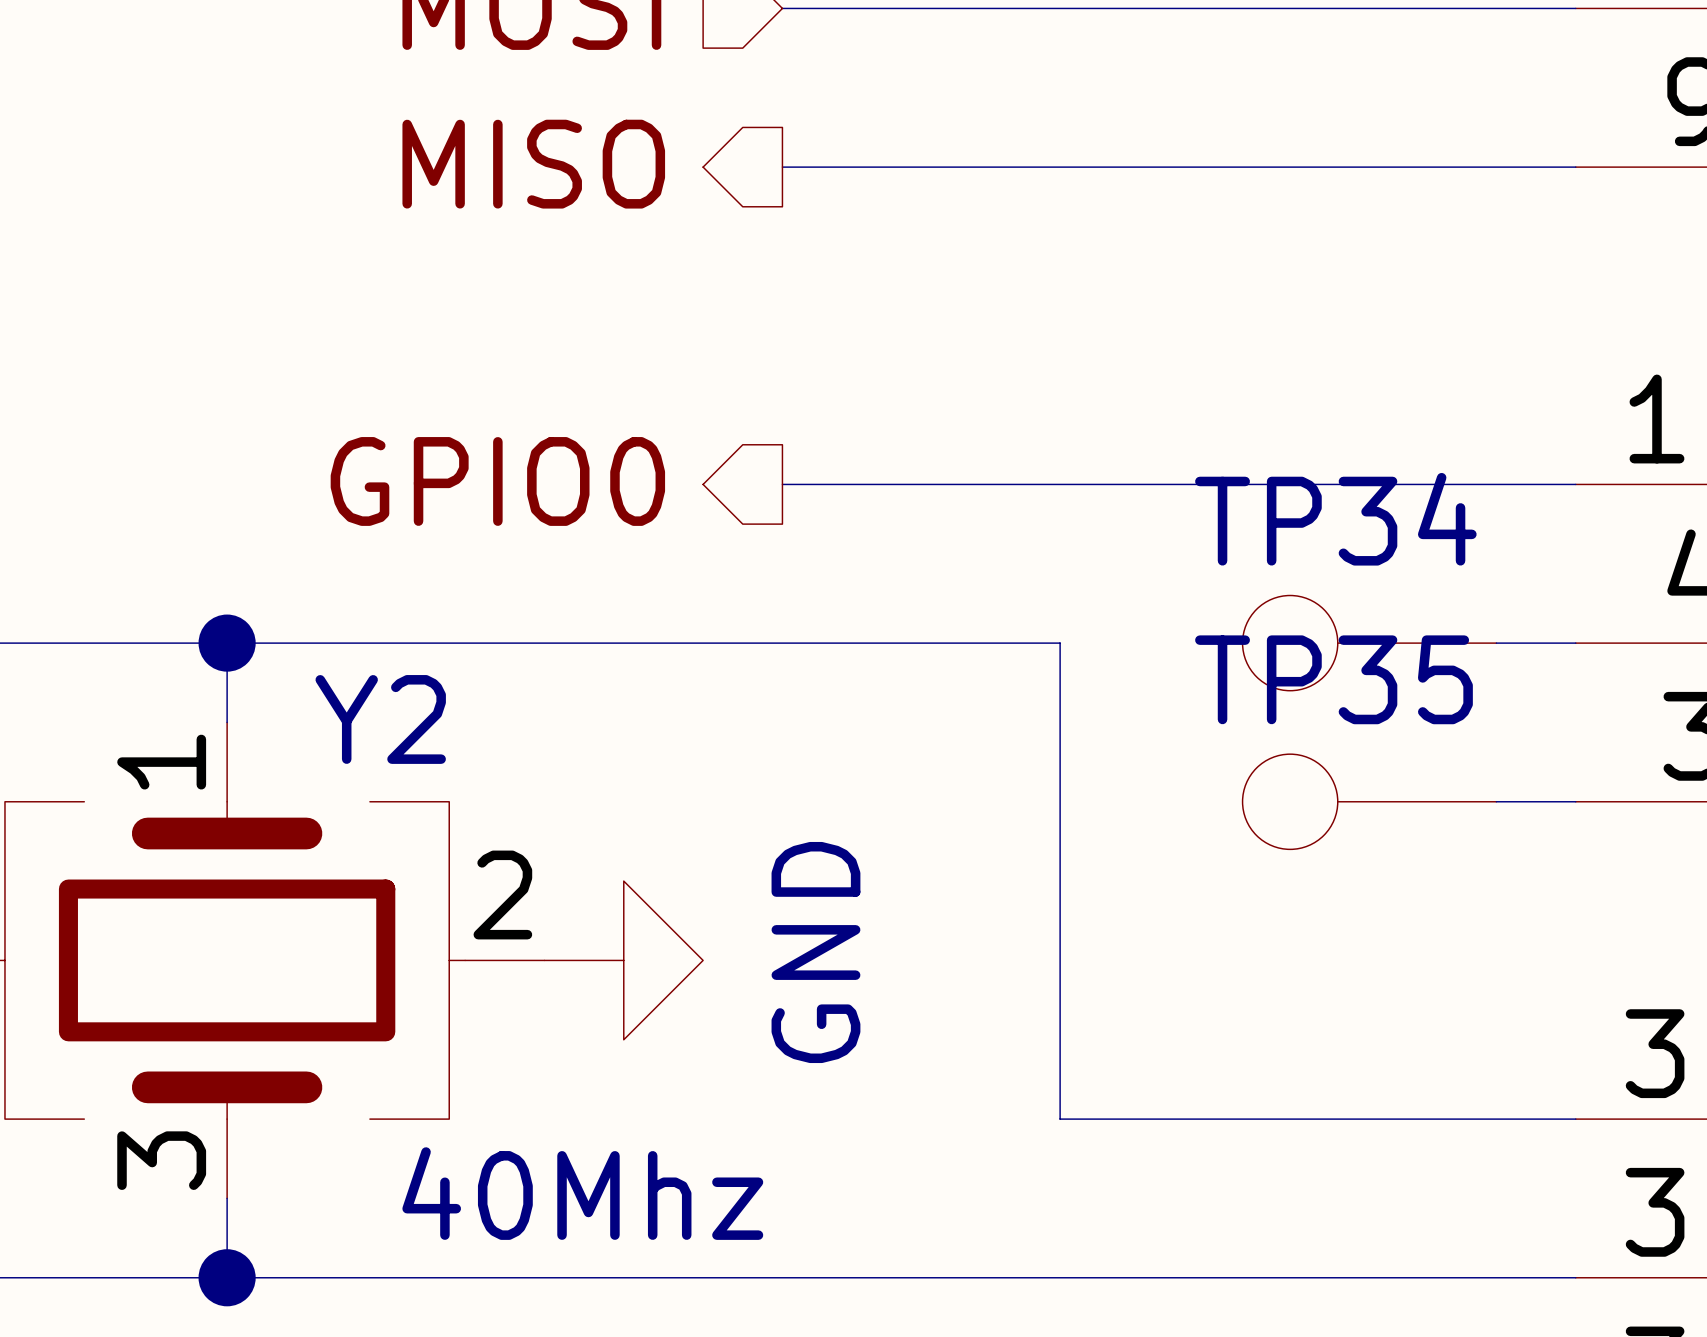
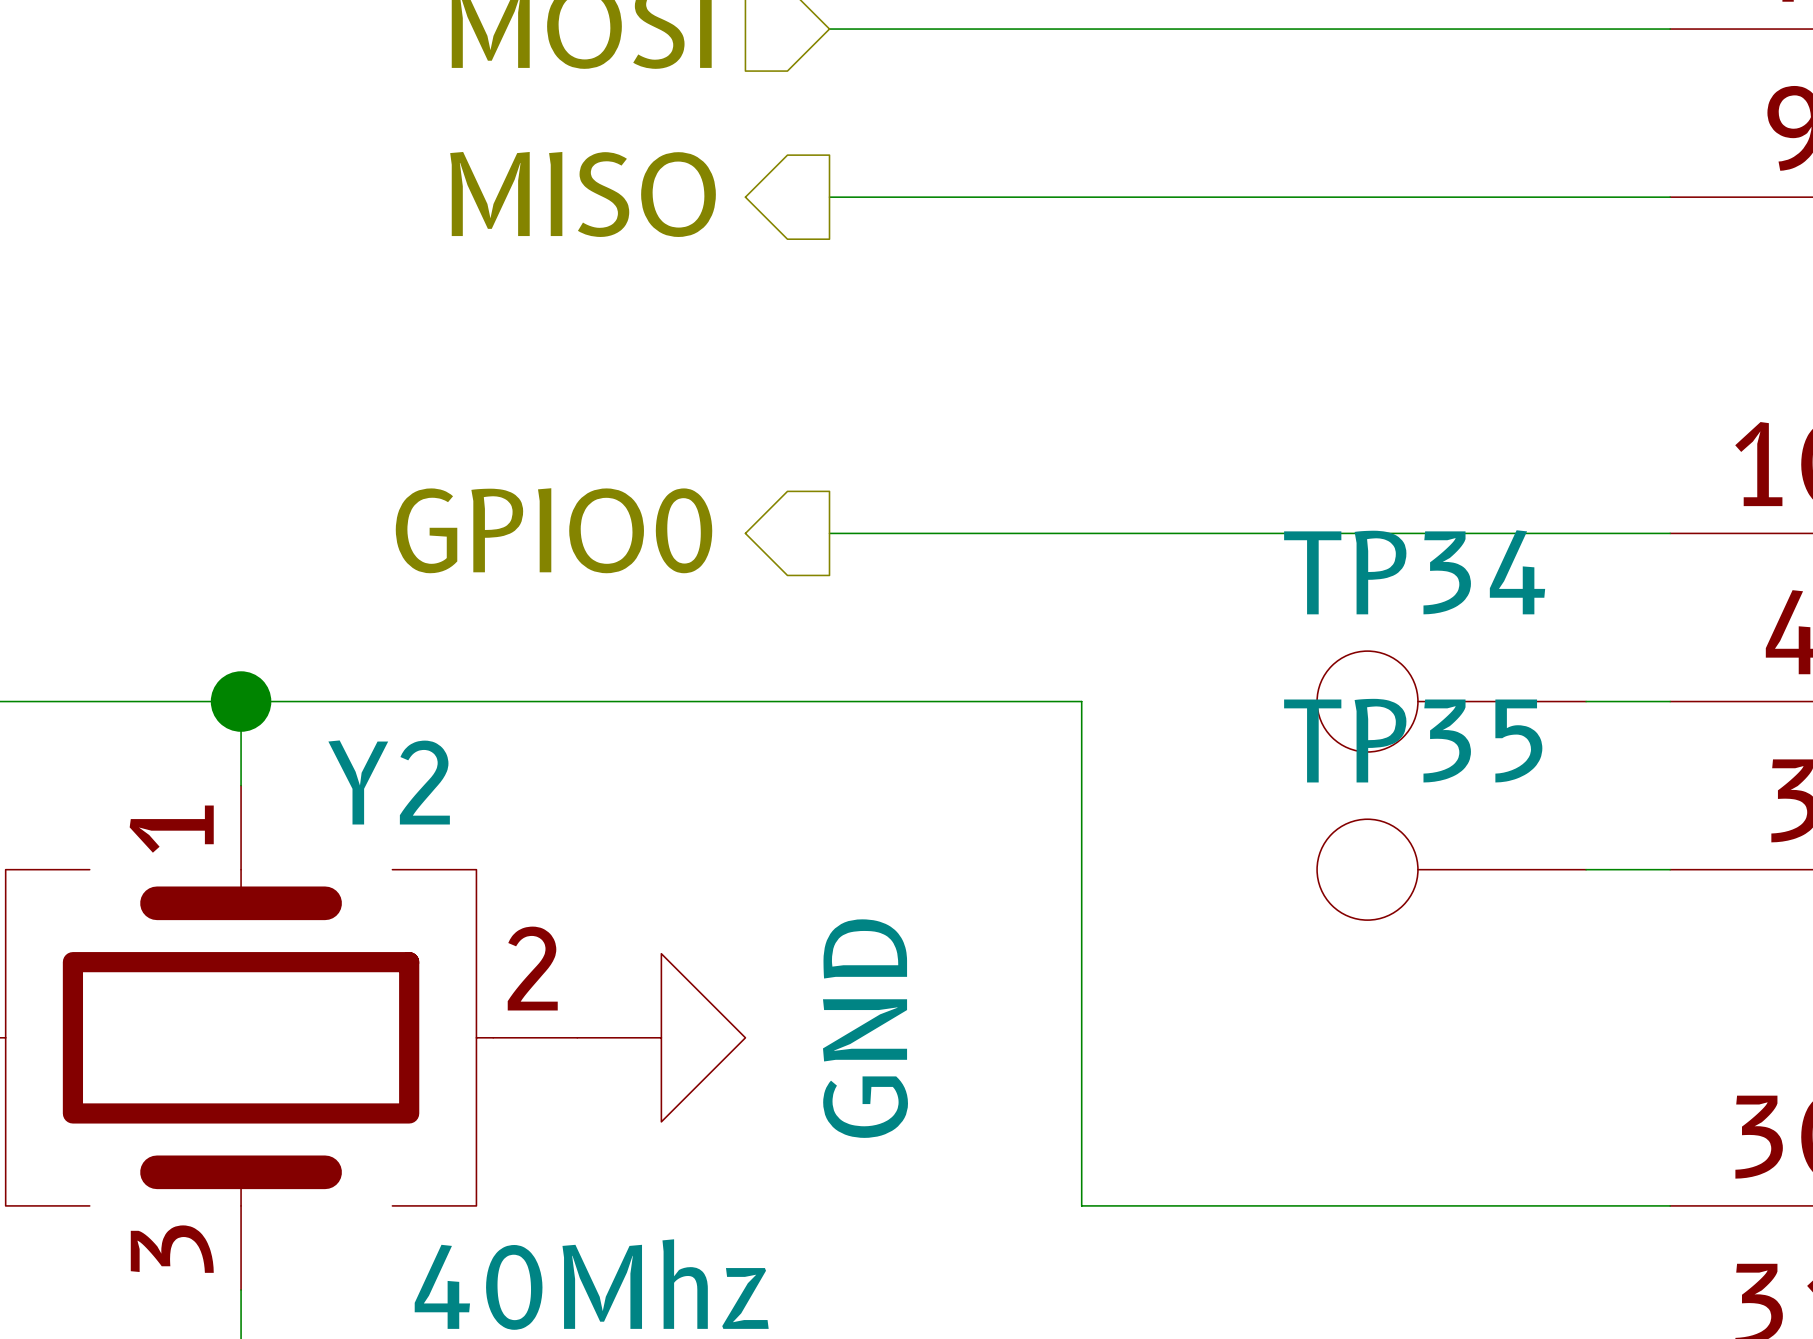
wire: (1020, 643) (1060, 643) (1060, 1119) -> (1081, 701) (1081, 1205) (1123, 1205)

